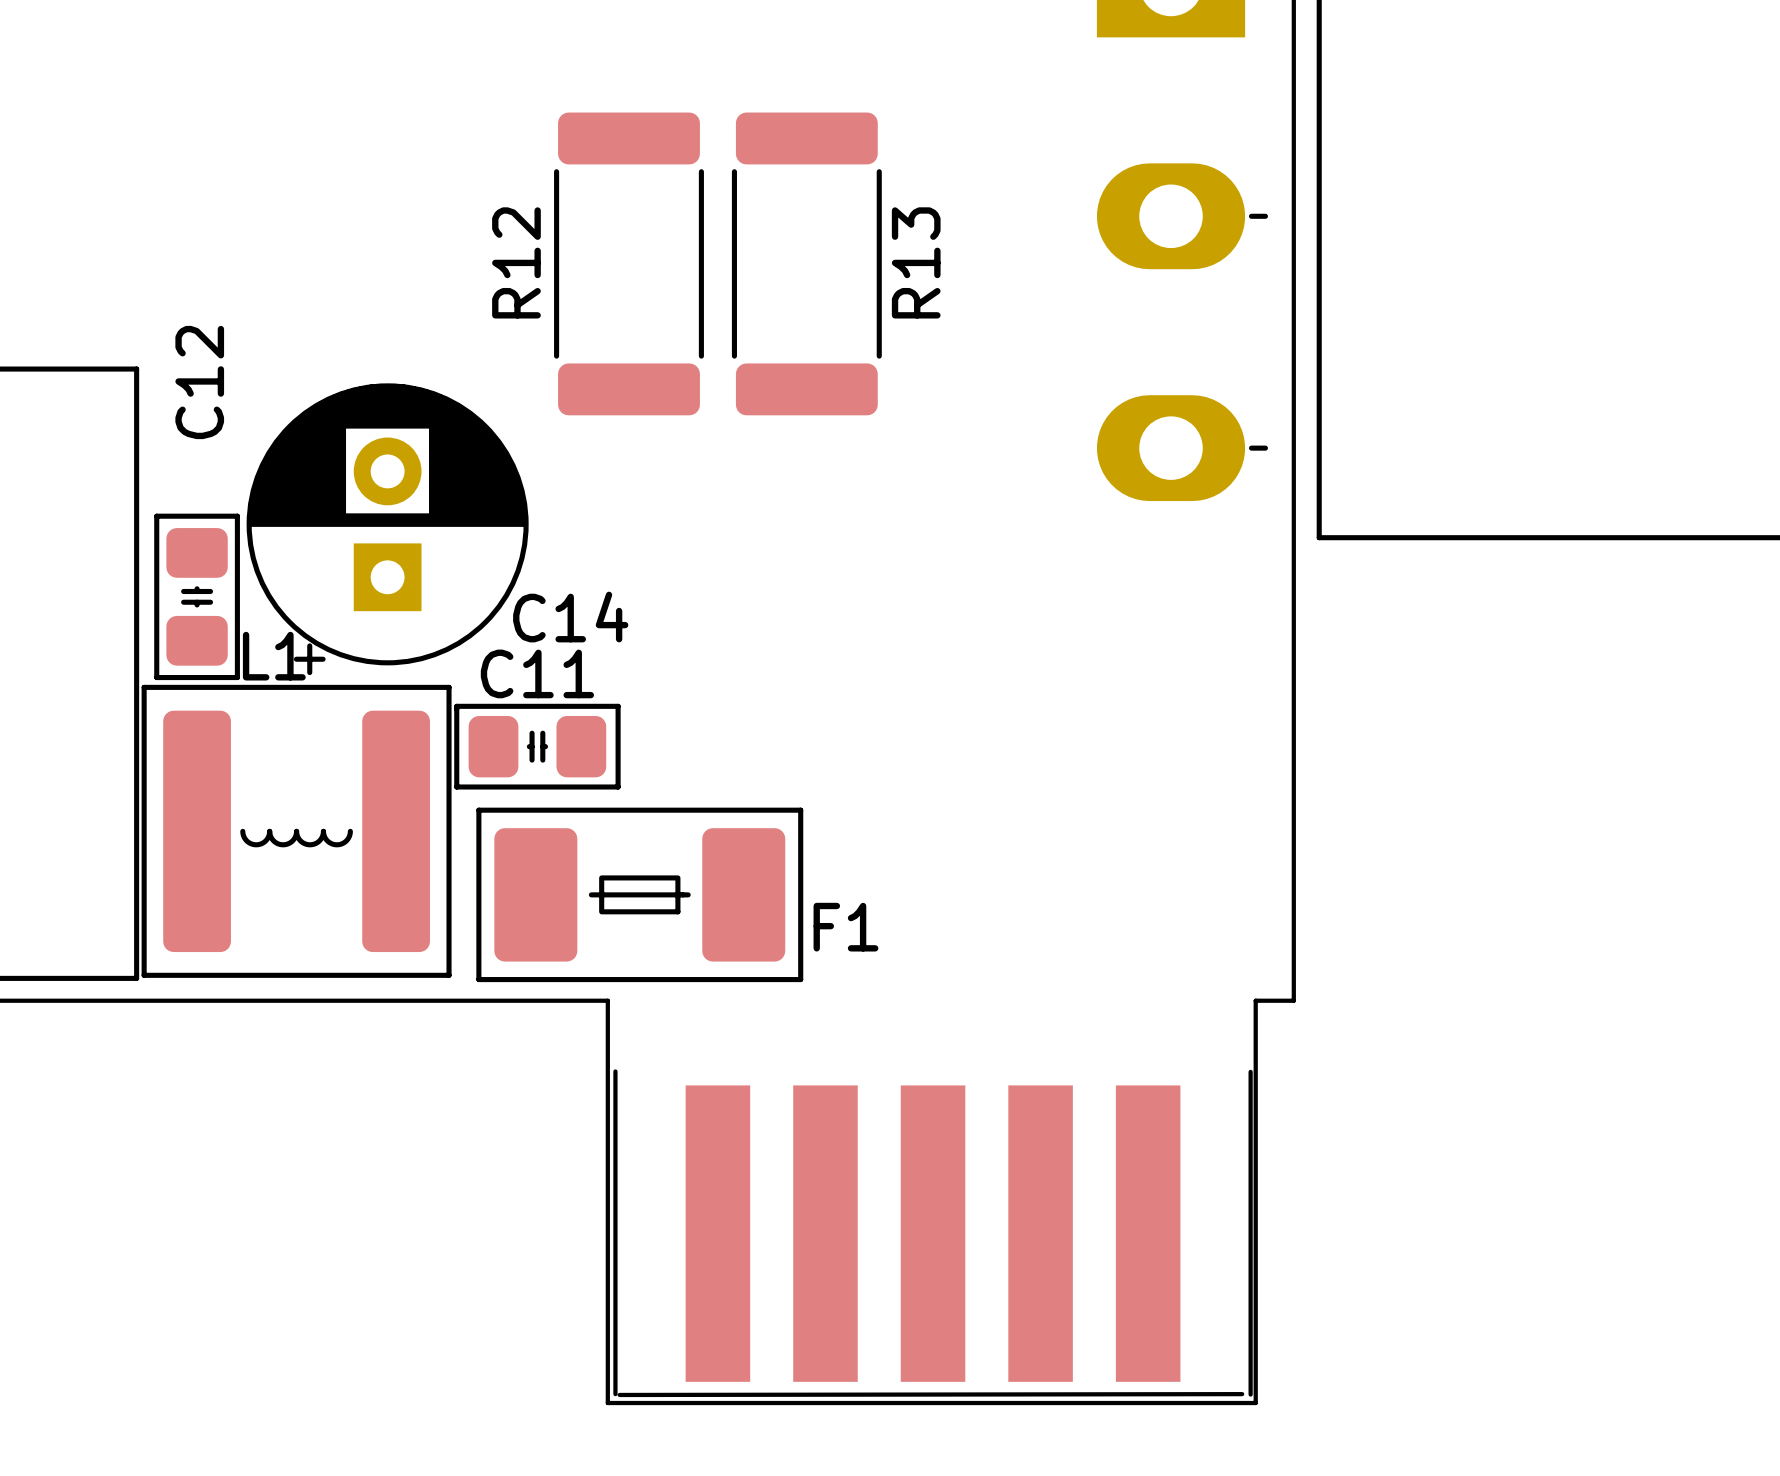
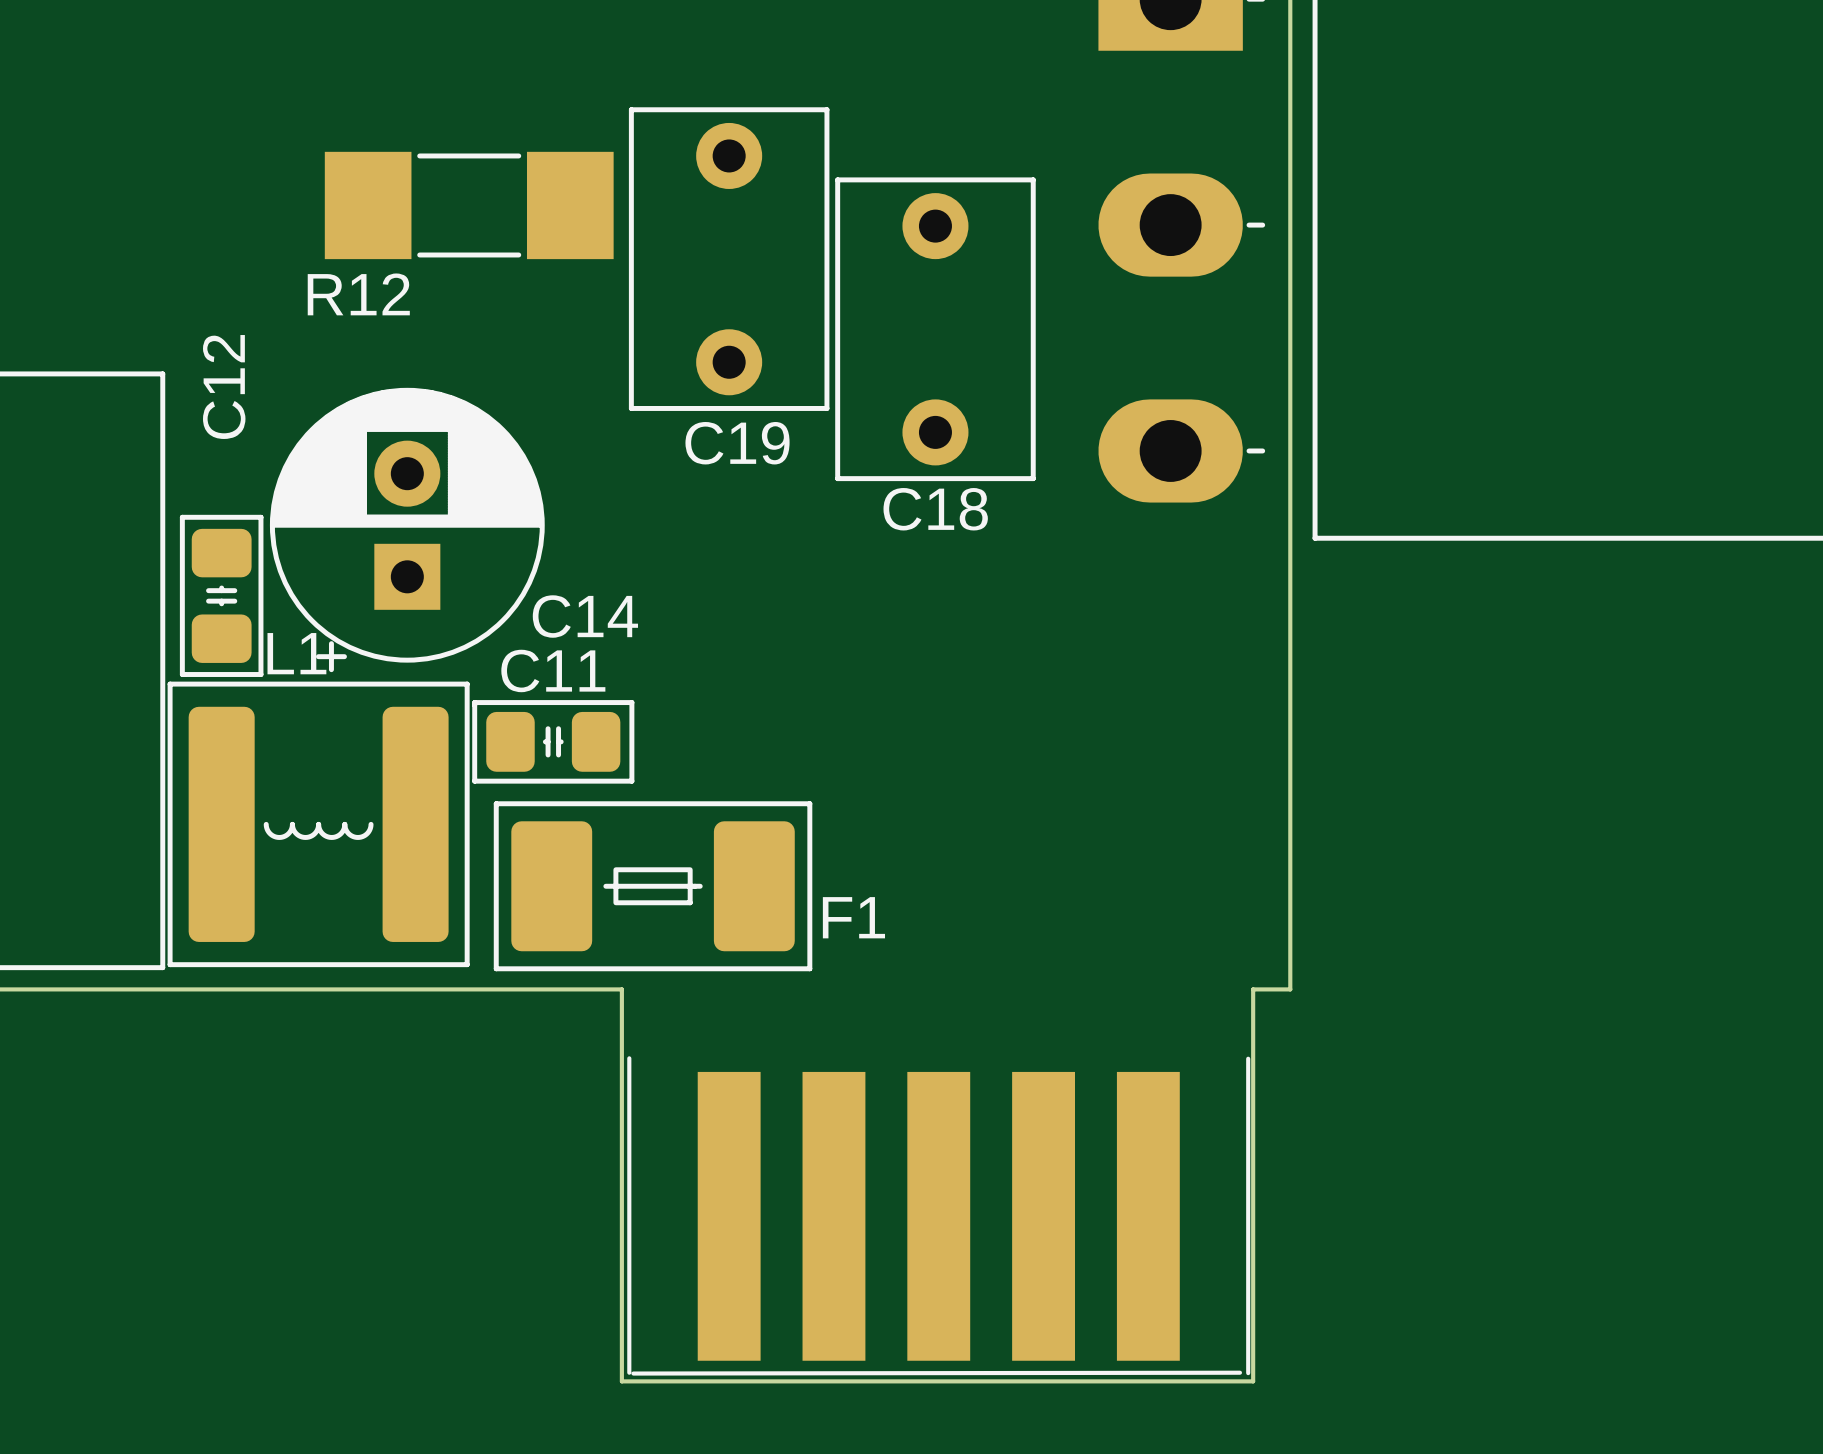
R12 footprint: [554, 112, 704, 416] -> [324, 151, 614, 260]
C19: none -> (729, 259)
R12 name position: R12 (516, 262) -> R12 (358, 294)
R13: (806, 263) -> none
C18: none -> (935, 329)

